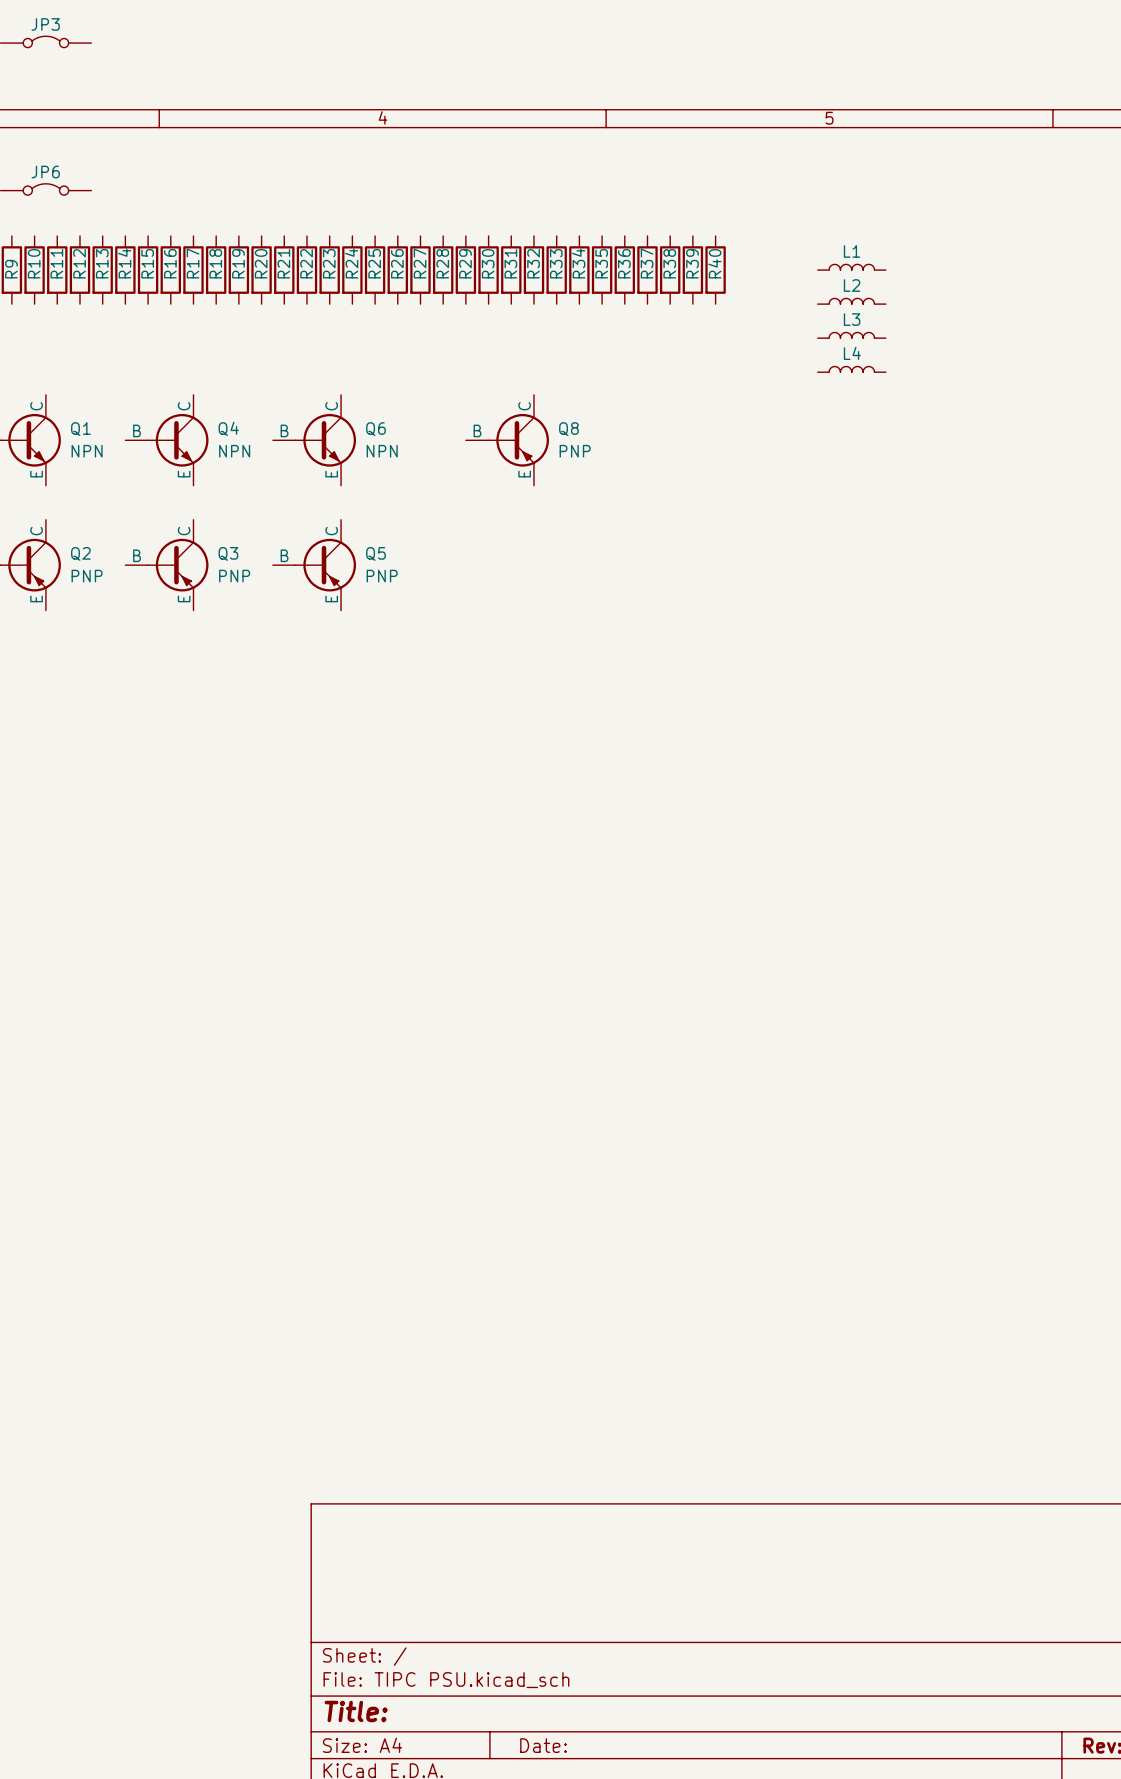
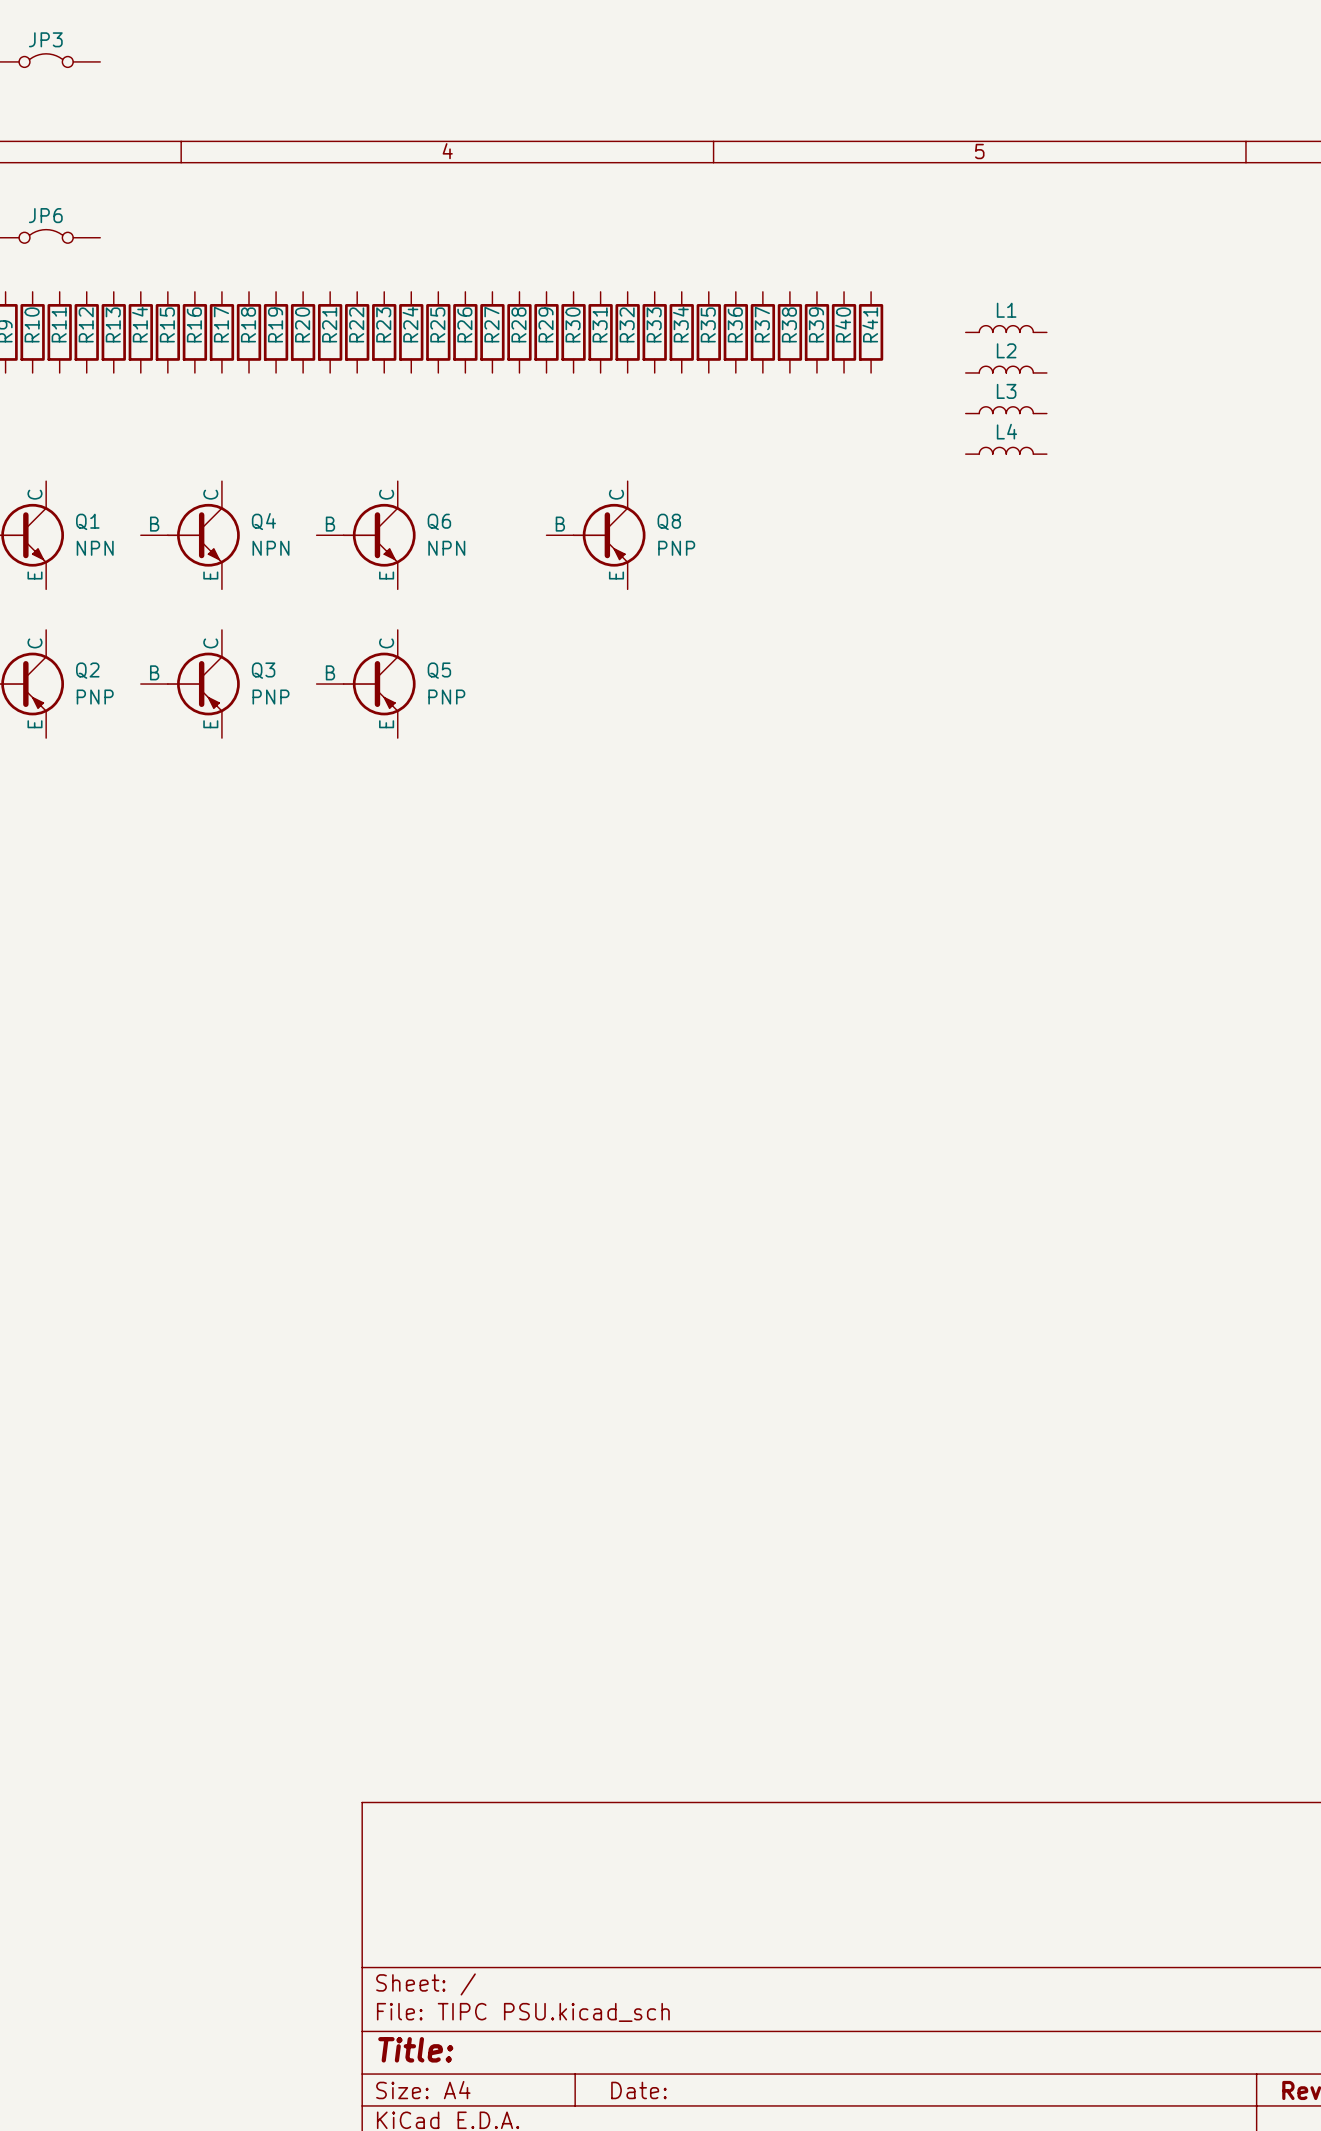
R41: none -> (871, 332)

